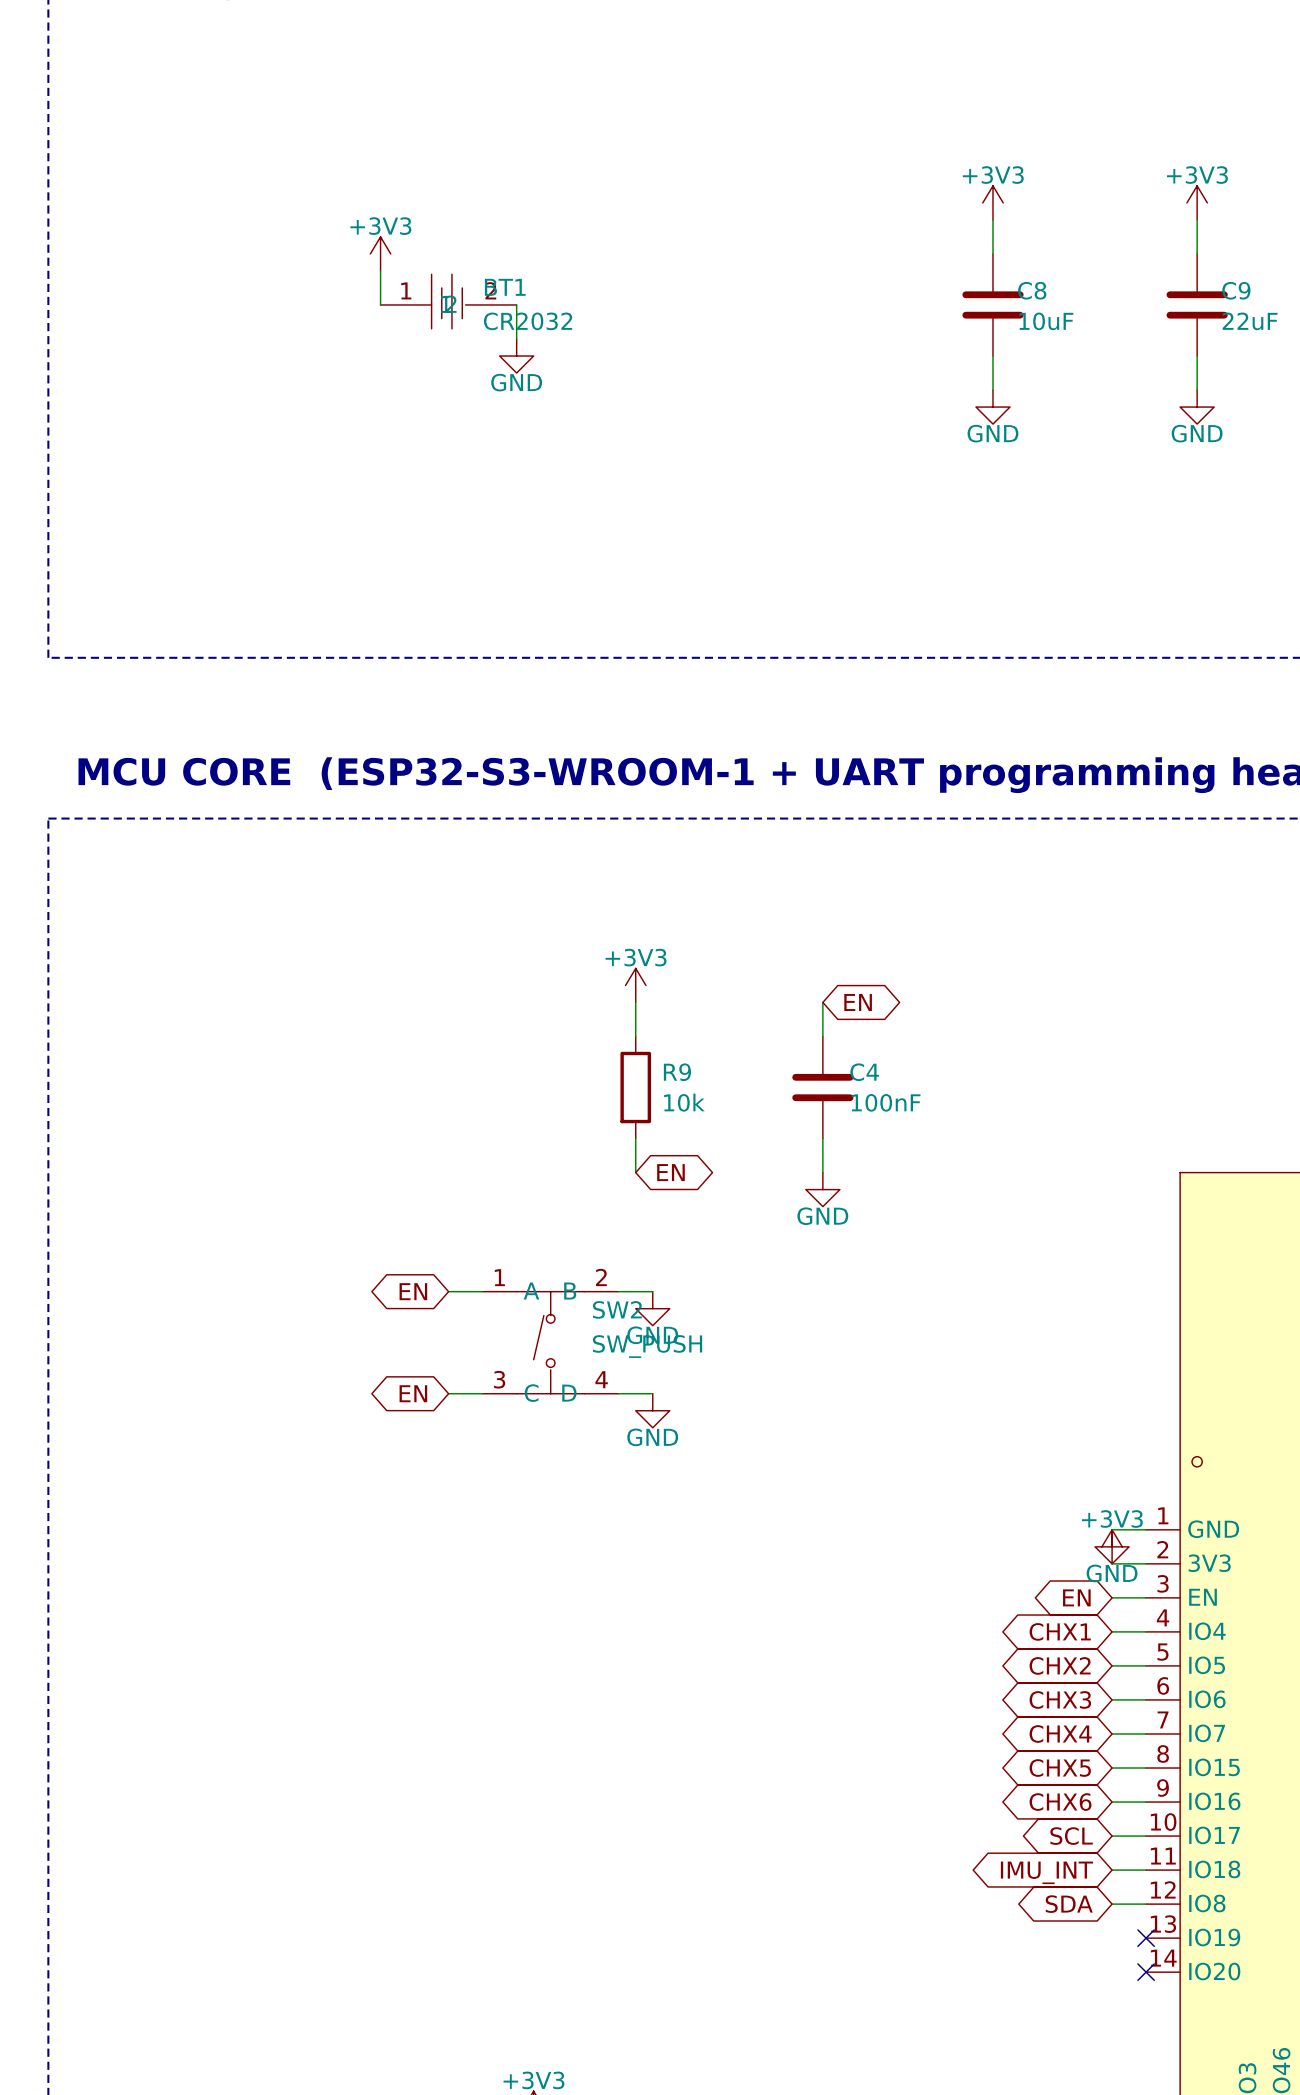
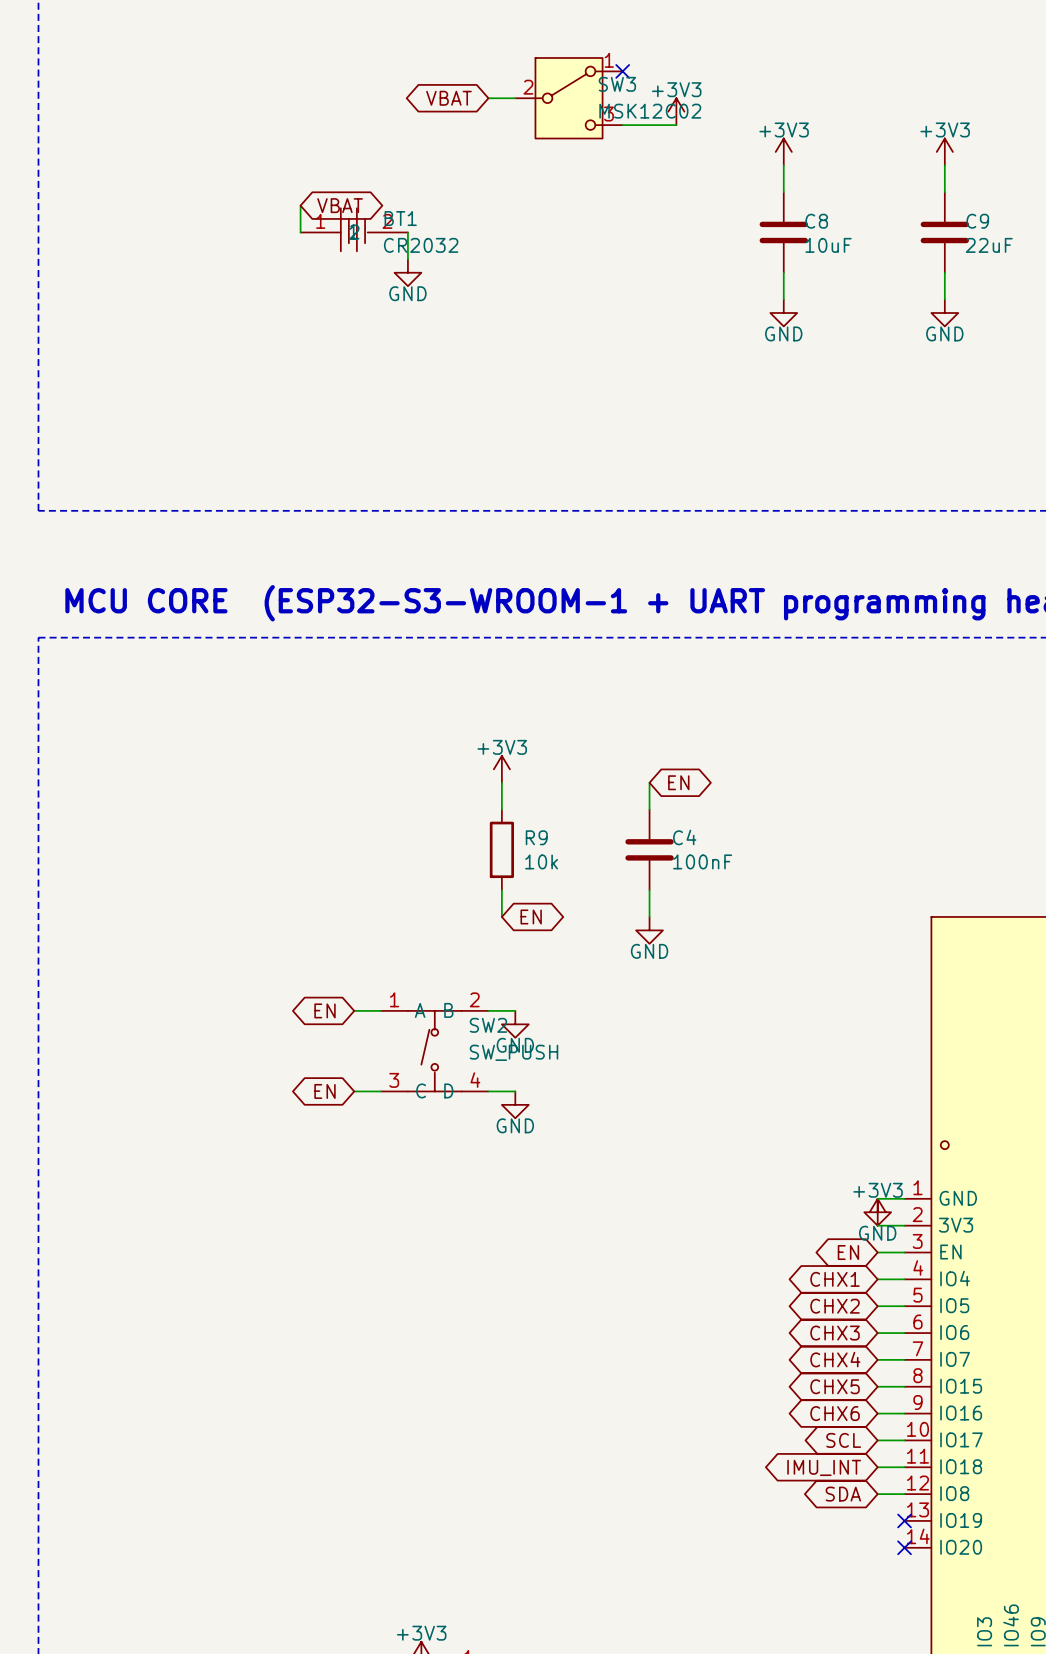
no-connect mark: none -> (622, 71)
global label: none -> VBAT (448, 98)
wire: none -> (488, 98) (515, 98)
SW3: none -> MSK12C02 (569, 98)
power symbol: none -> +3V3 (676, 111)
wire: none -> (622, 125) (676, 125)
power symbol: +3V3 (380, 253) -> none
global label: none -> VBAT (340, 205)

